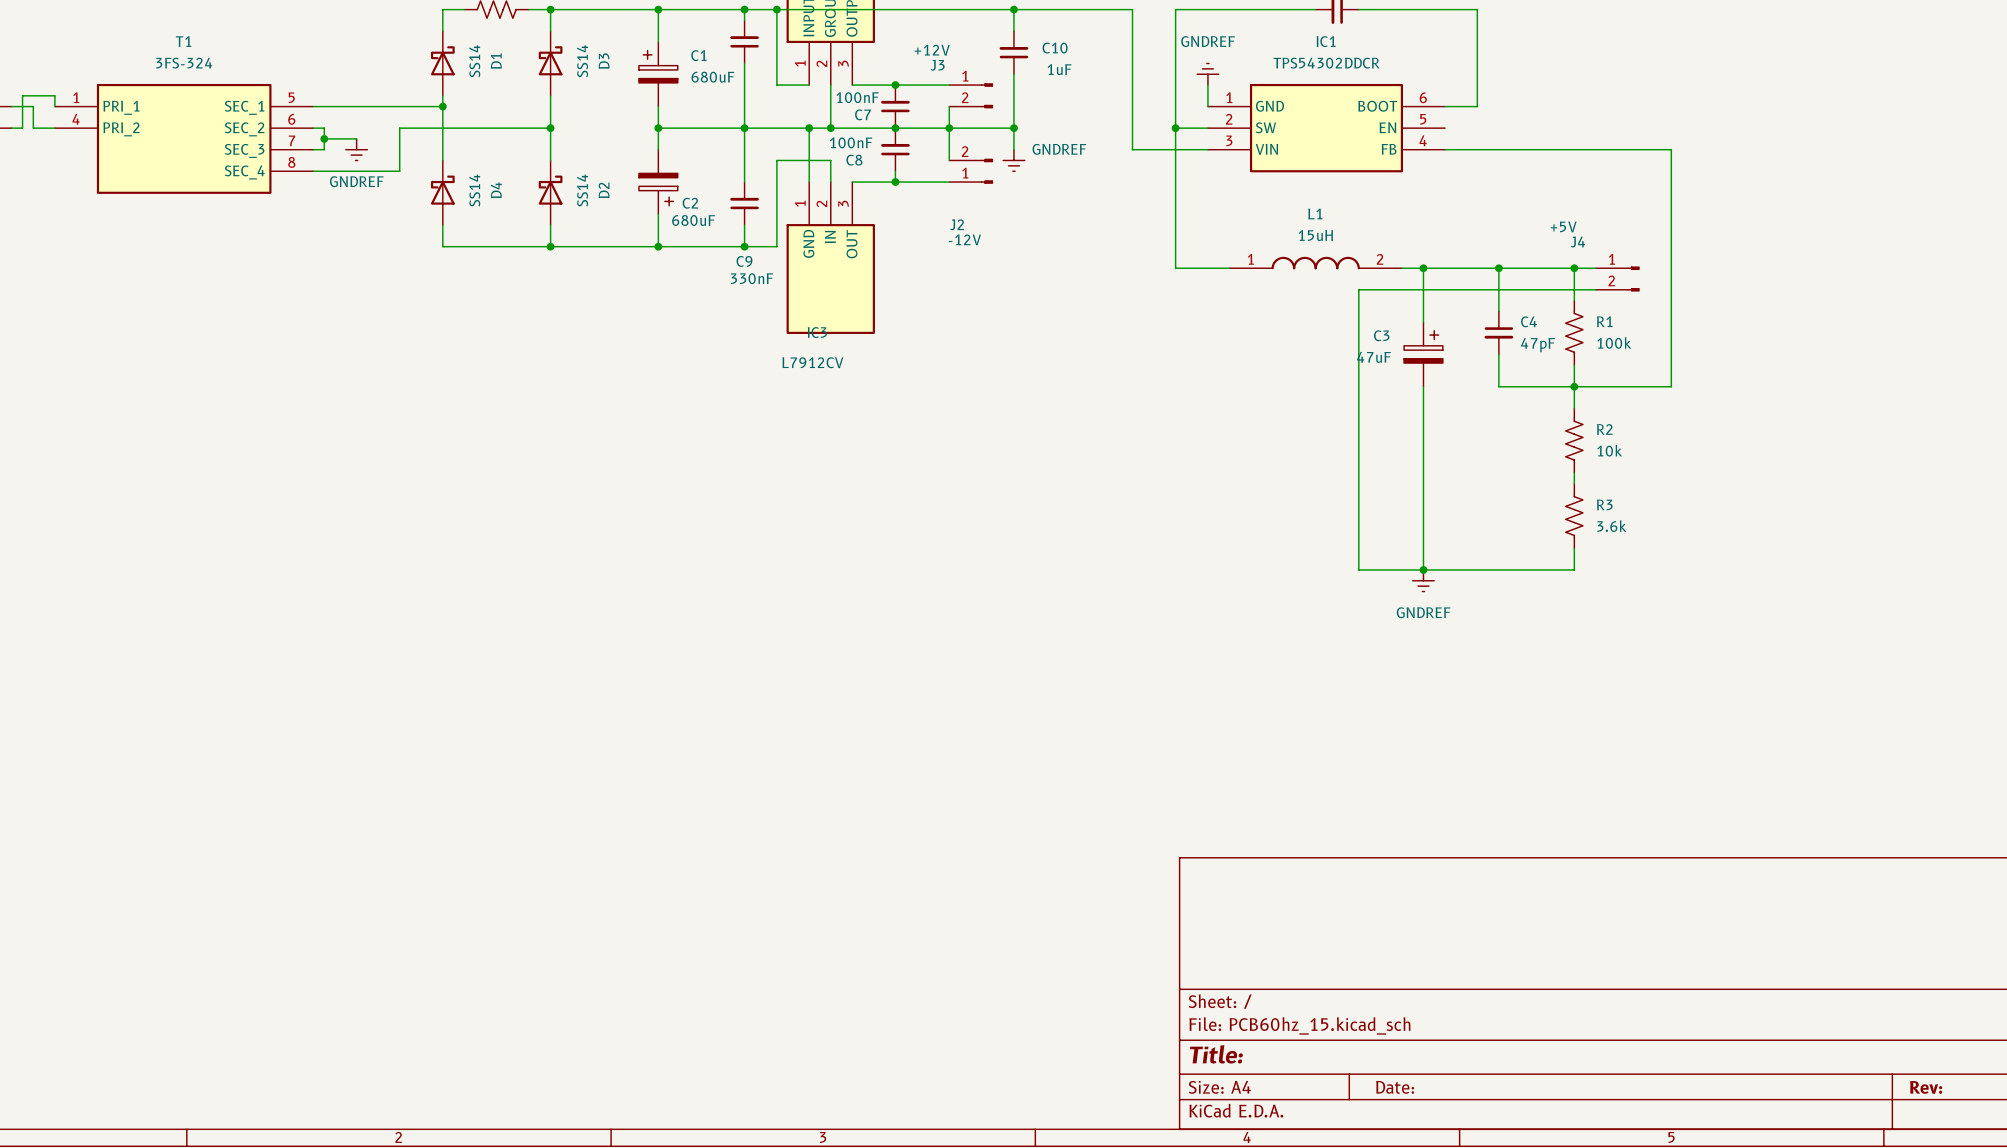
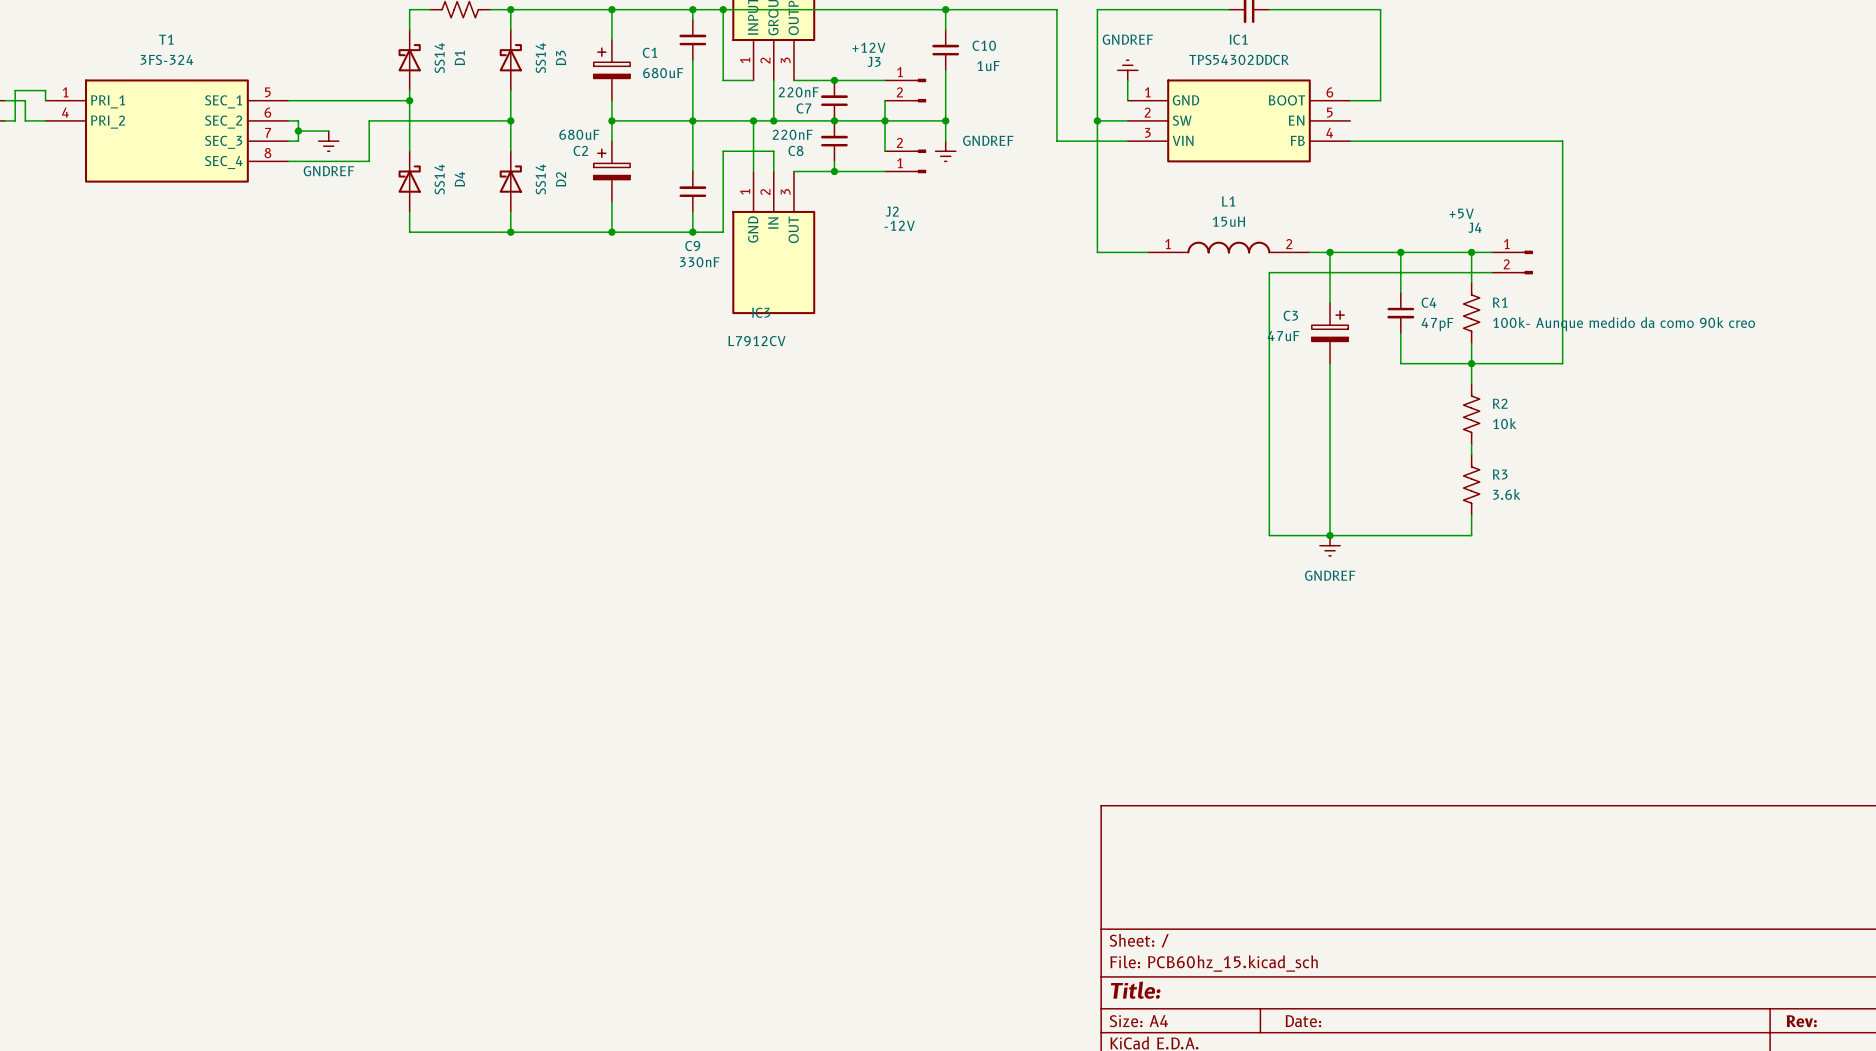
C7 value: 100nF (857, 97) -> 220nF (798, 92)
C8 value: 100nF (851, 142) -> 220nF (792, 134)
C2 rotation: 0° (658, 189) -> 180° (611, 164)
R1 value: 100k (1614, 342) -> 100k- Aunque medido da como 90k creo (1624, 324)

